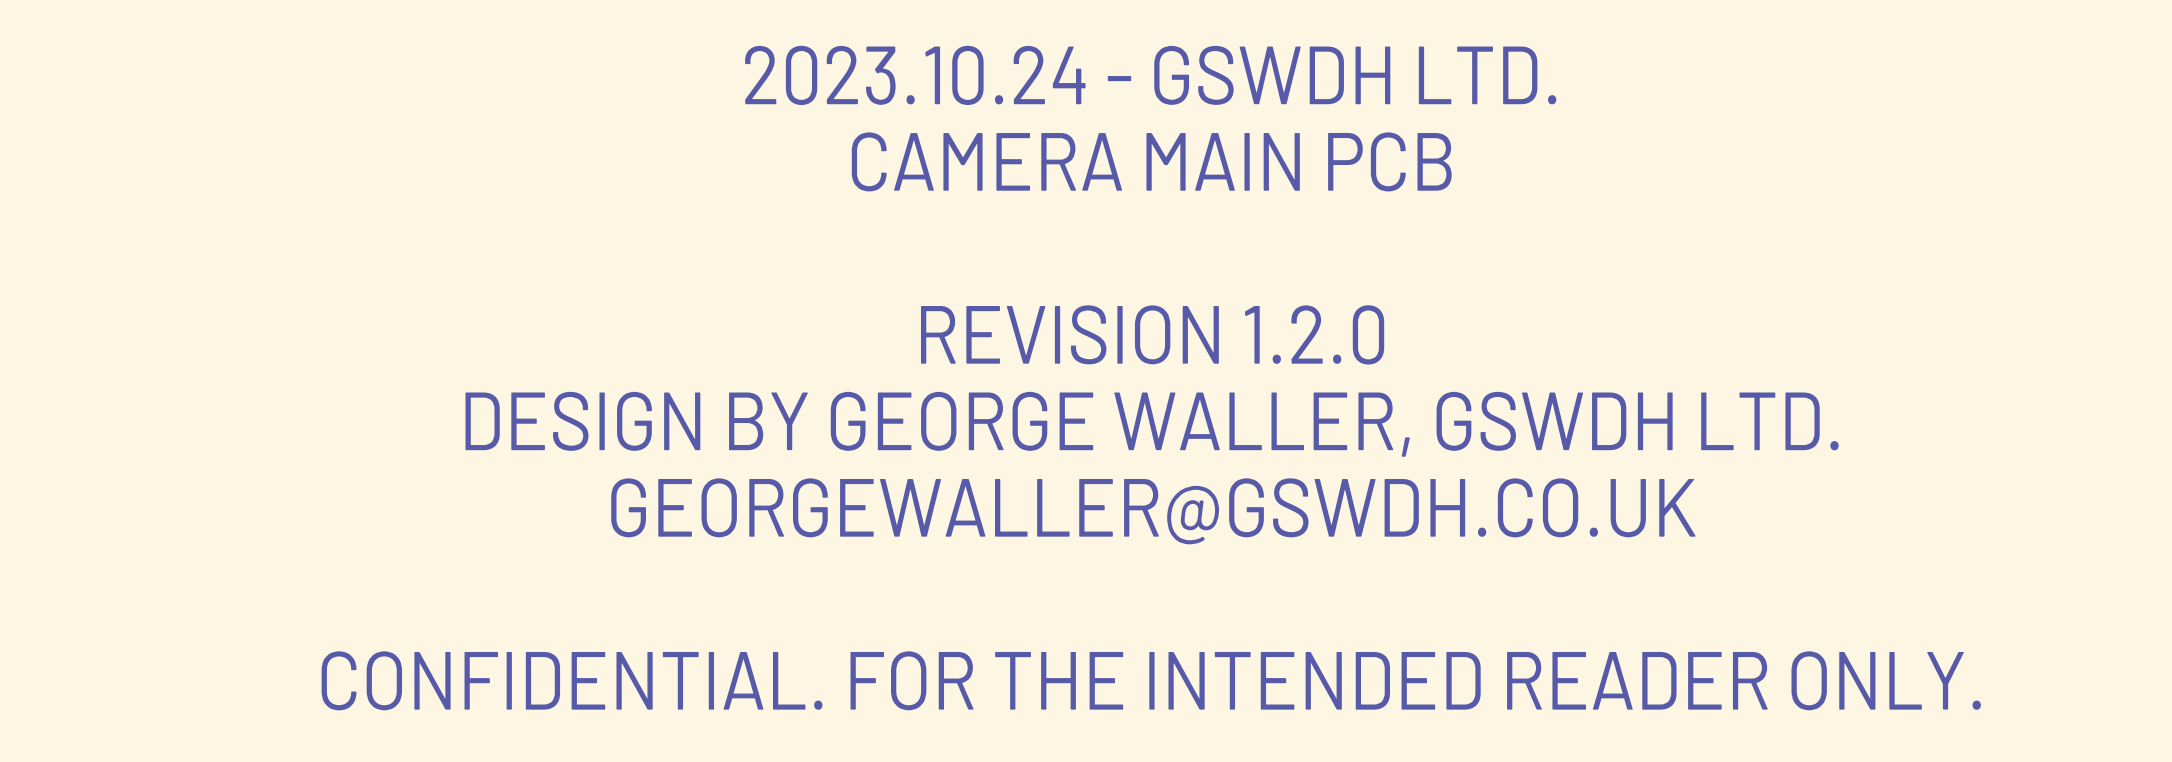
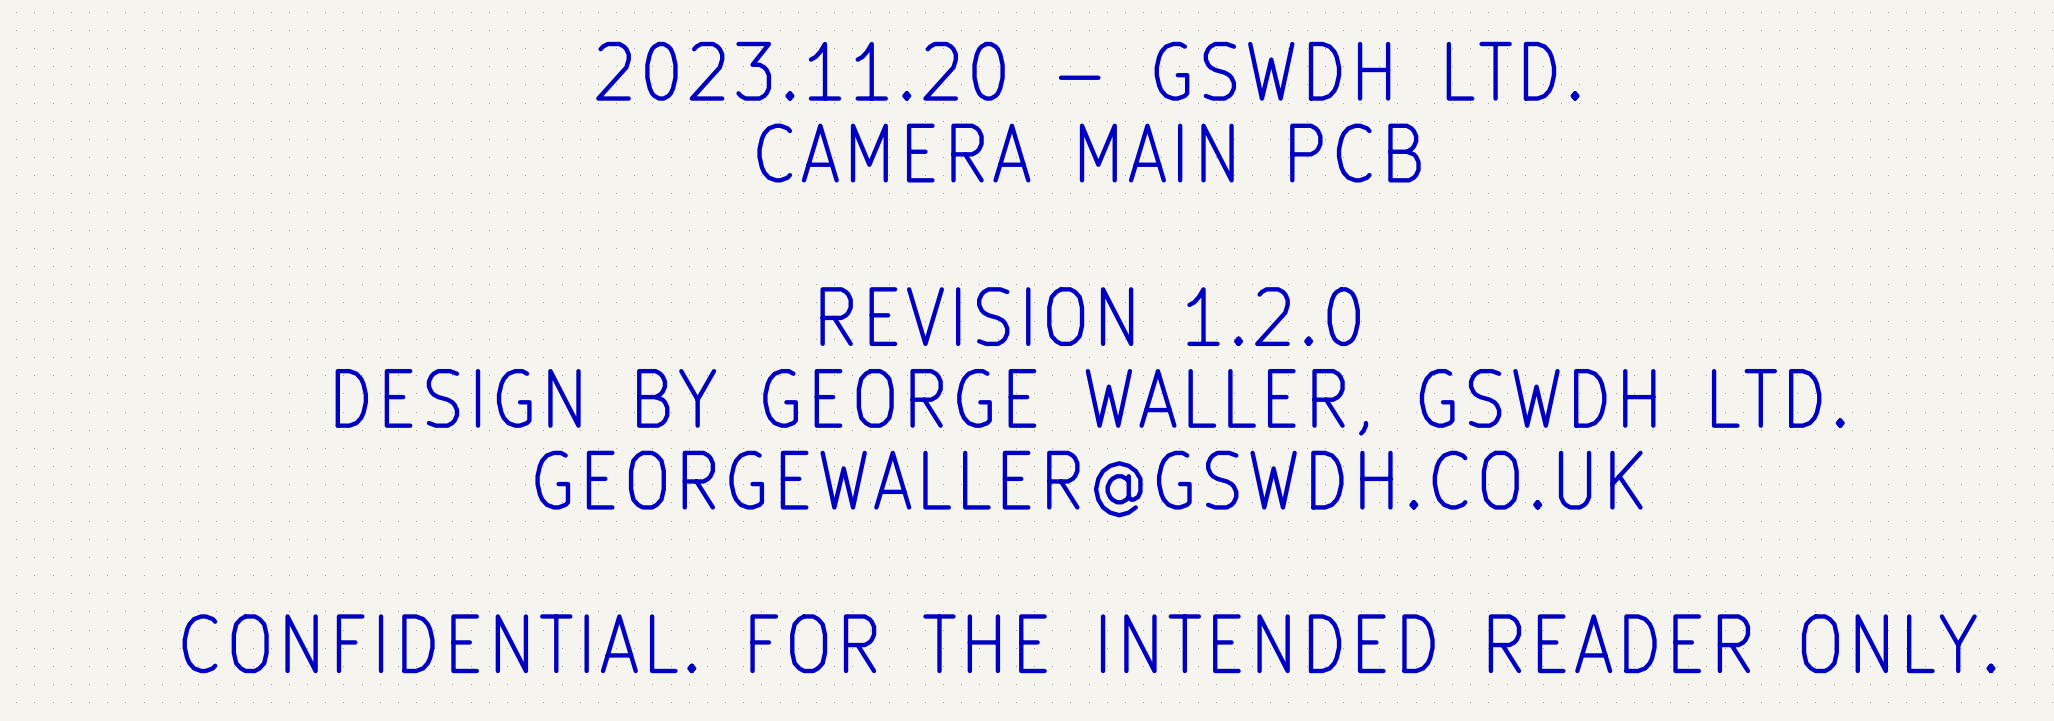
text: 2023.10.24 - GSWDH LTD. (1150, 75) -> 2023.11.20 - GSWDH LTD. (1087, 71)

